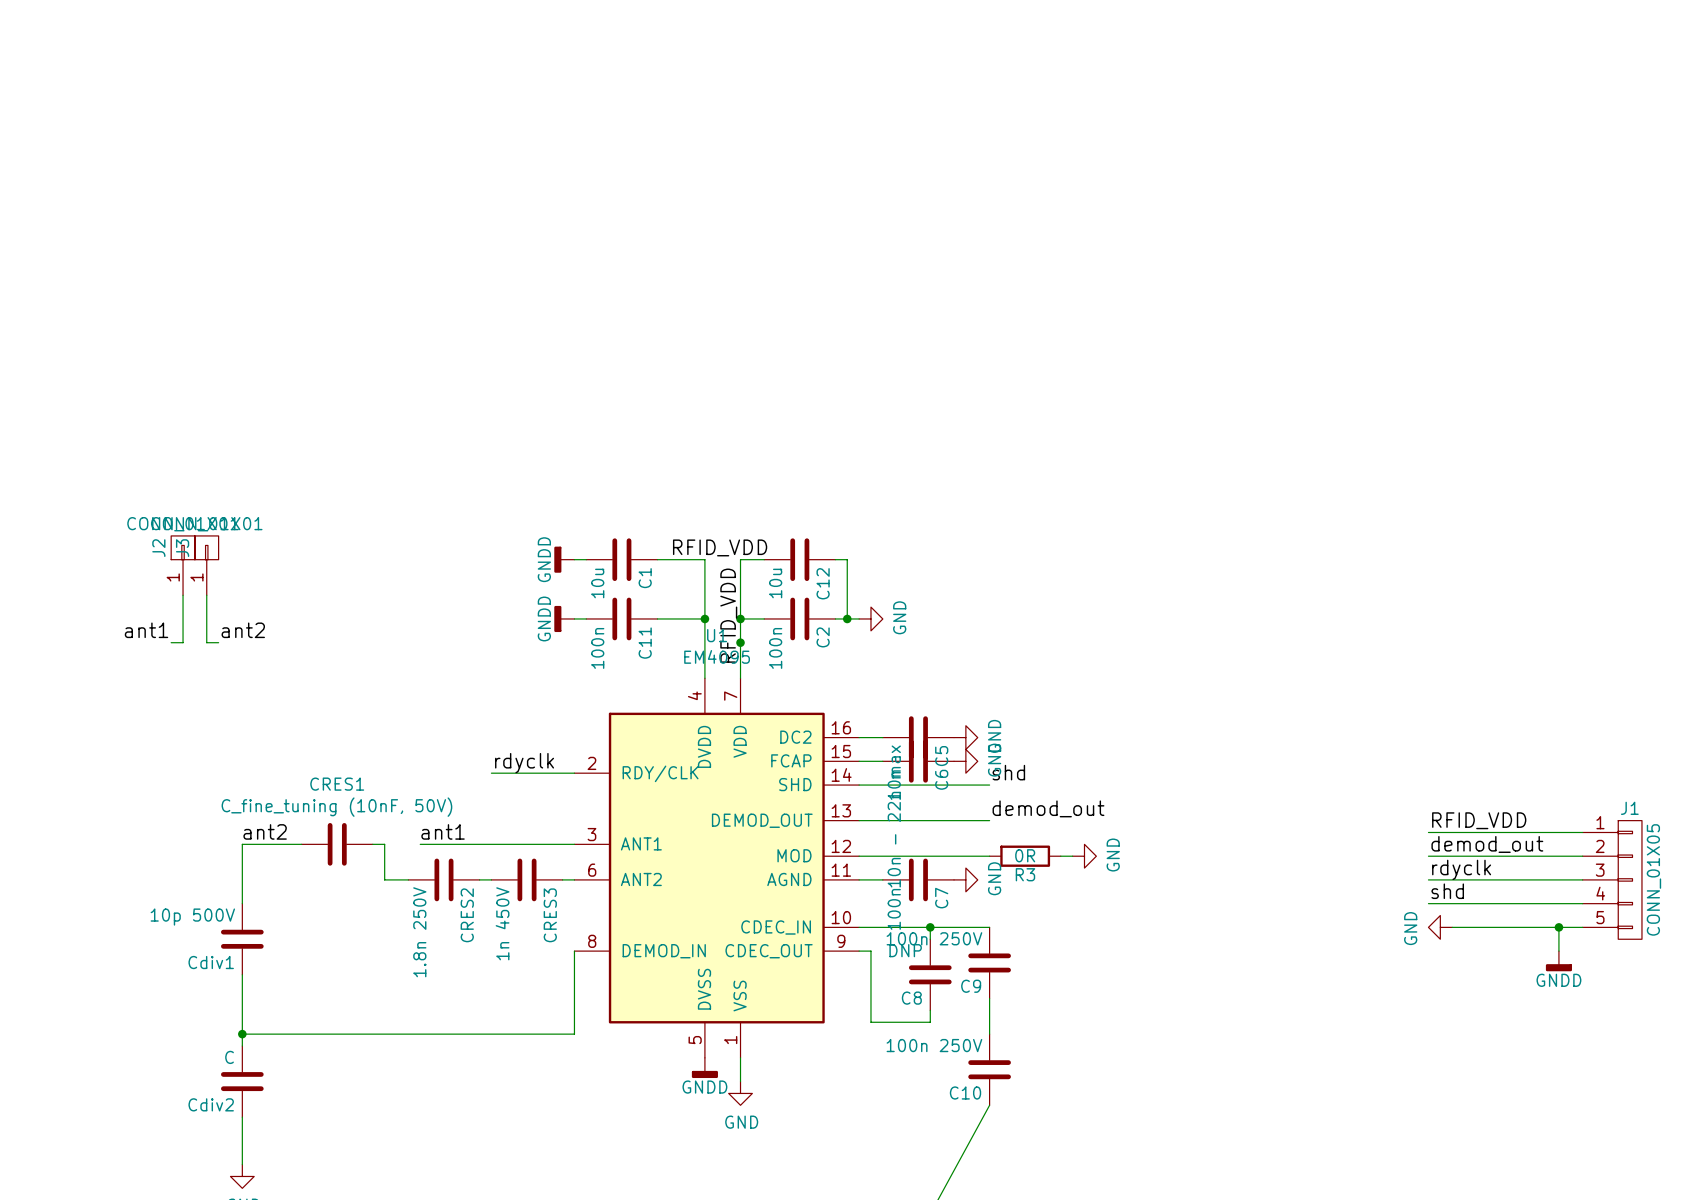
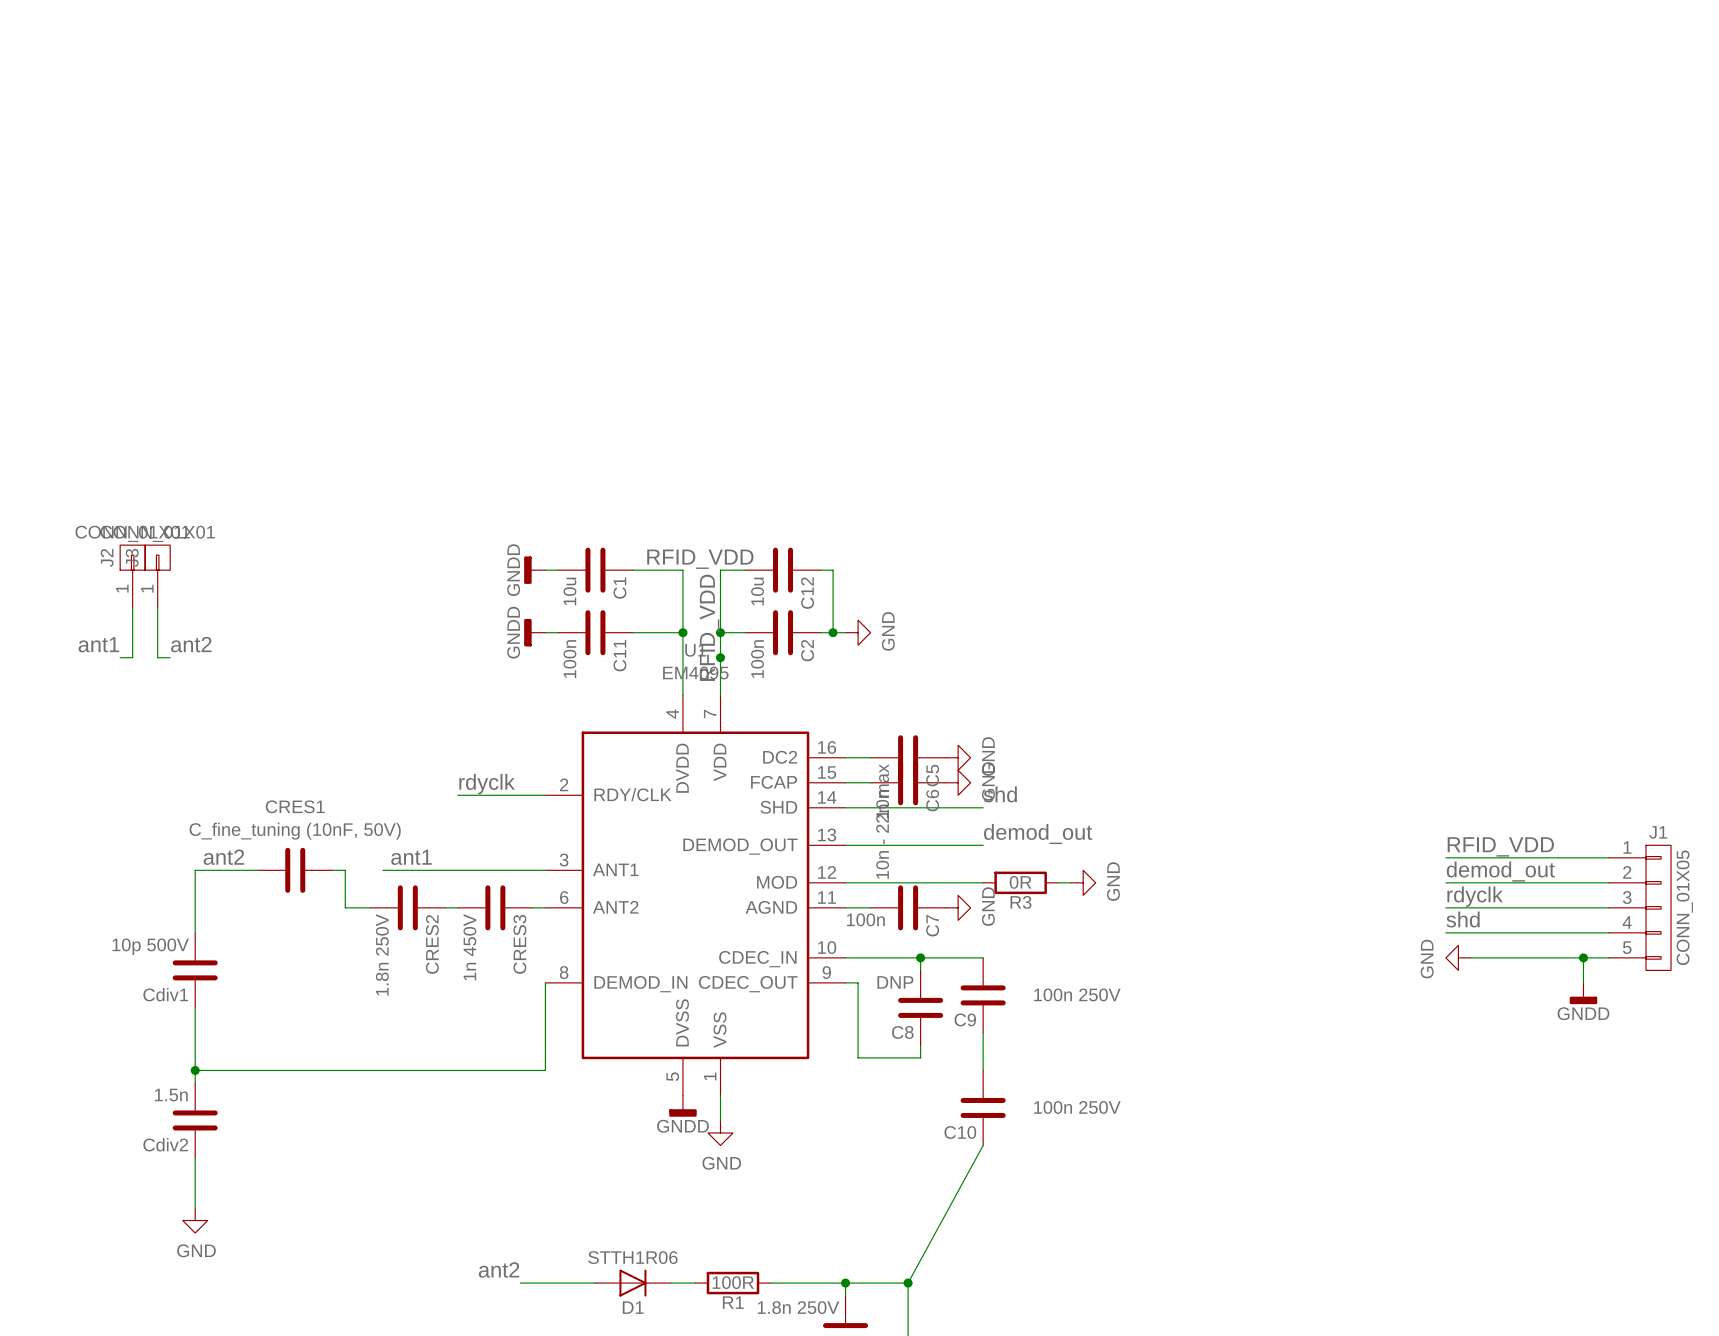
C7 value rotation: 0° (894, 909) -> 90° clockwise (865, 919)
C9 value position: 100n 250V (934, 938) -> 100n 250V (1077, 994)
C10 value position: 100n 250V (934, 1045) -> 100n 250V (1077, 1107)
Cdiv2 value: C (229, 1057) -> 1.5n (171, 1095)

